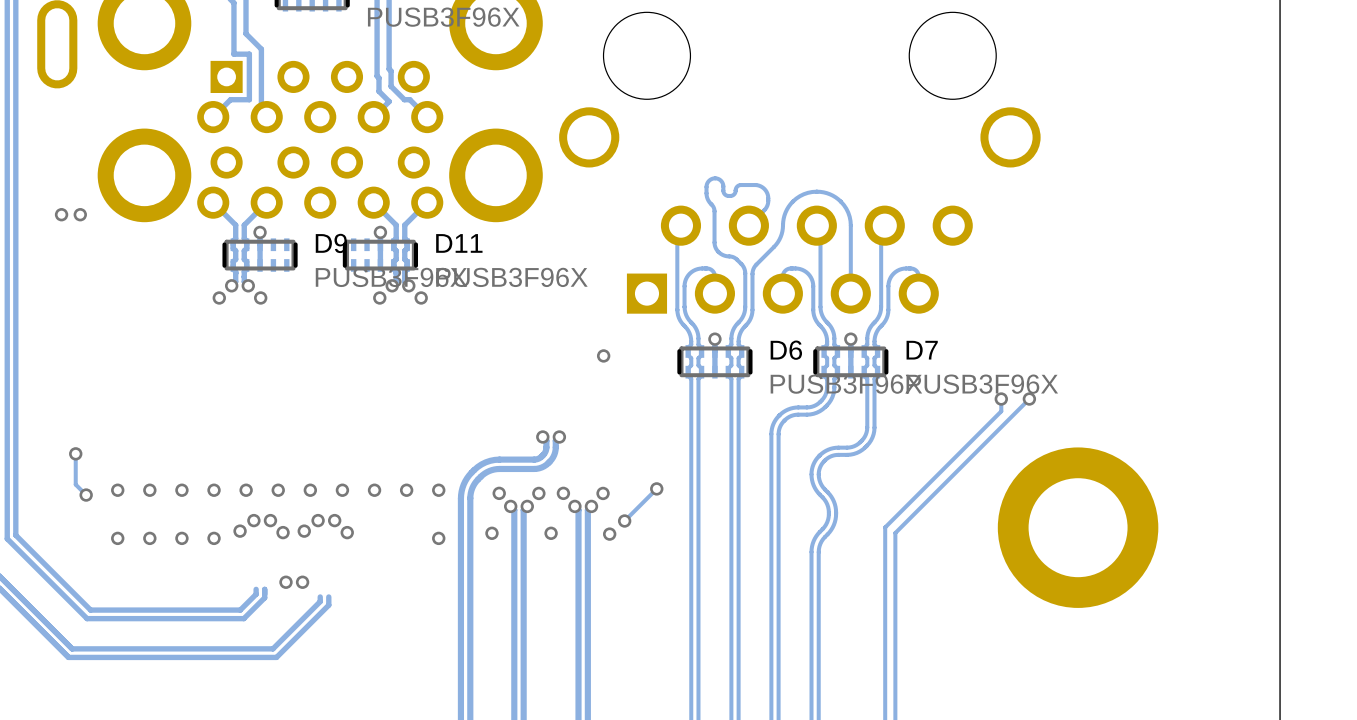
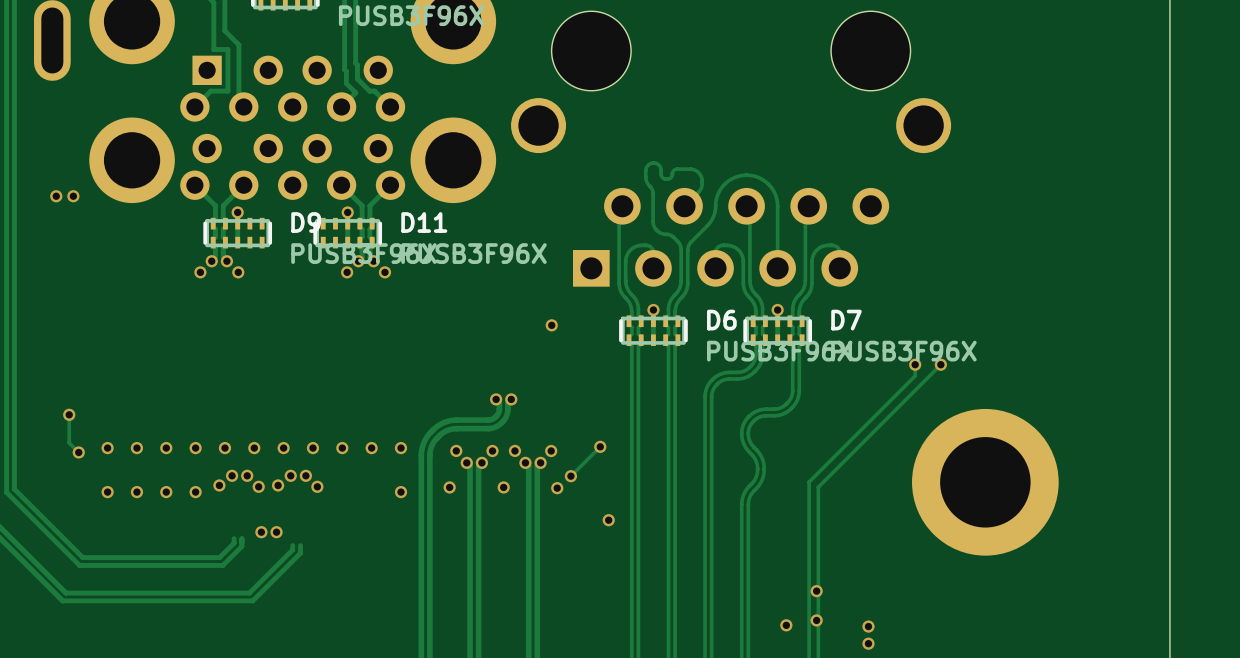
via: none -> (608, 520)
via: none -> (816, 591)
via: none -> (816, 620)
via: none -> (786, 625)
via: none -> (868, 626)
via: none -> (868, 643)

